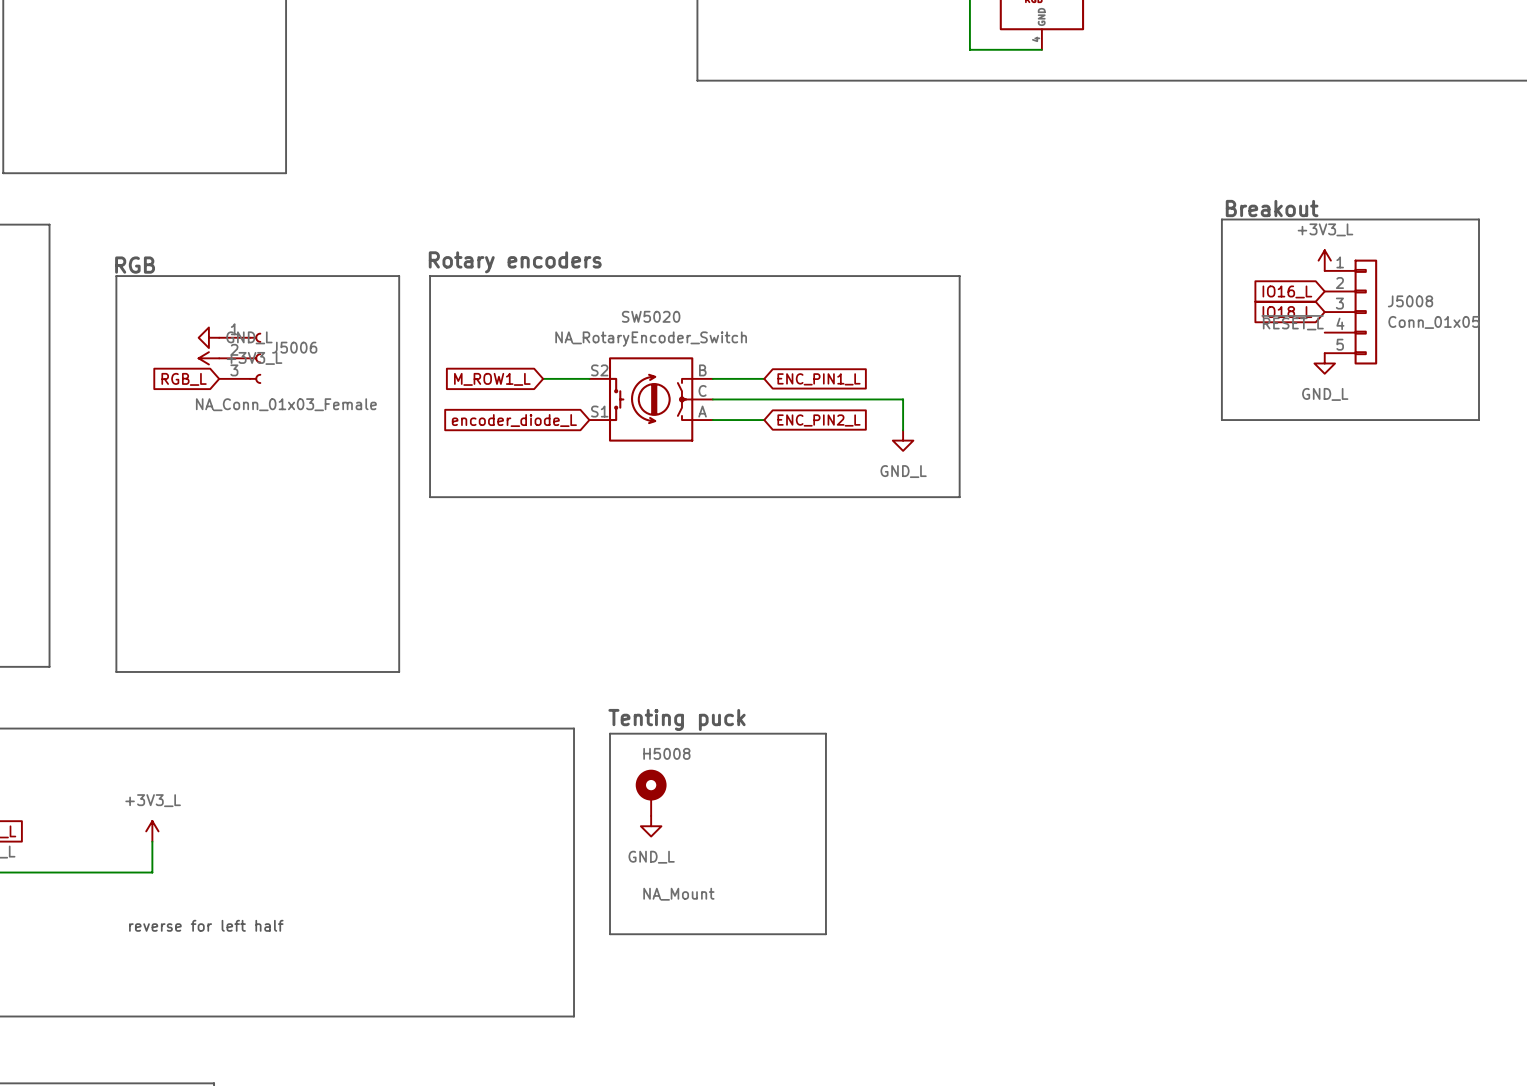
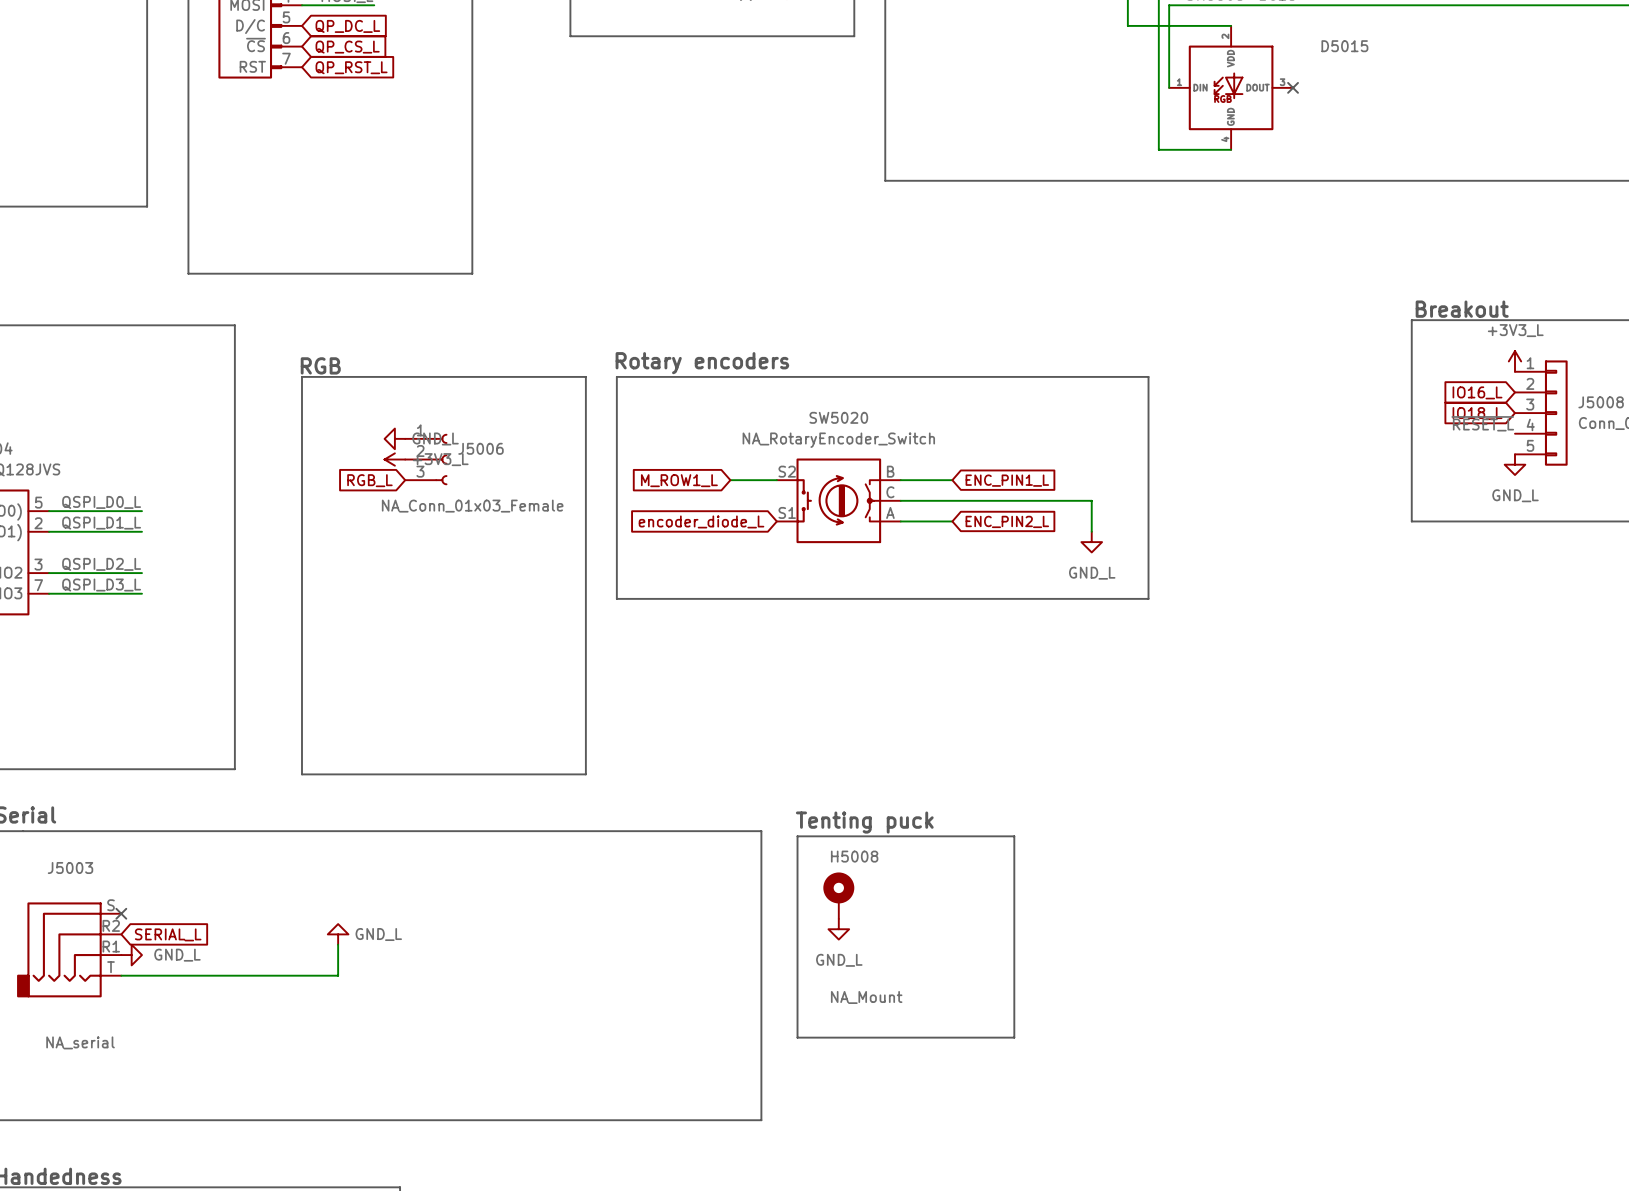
power symbol: +3V3_L (152, 831) -> GND_L (338, 934)
text: reverse for left half (206, 925) -> none

